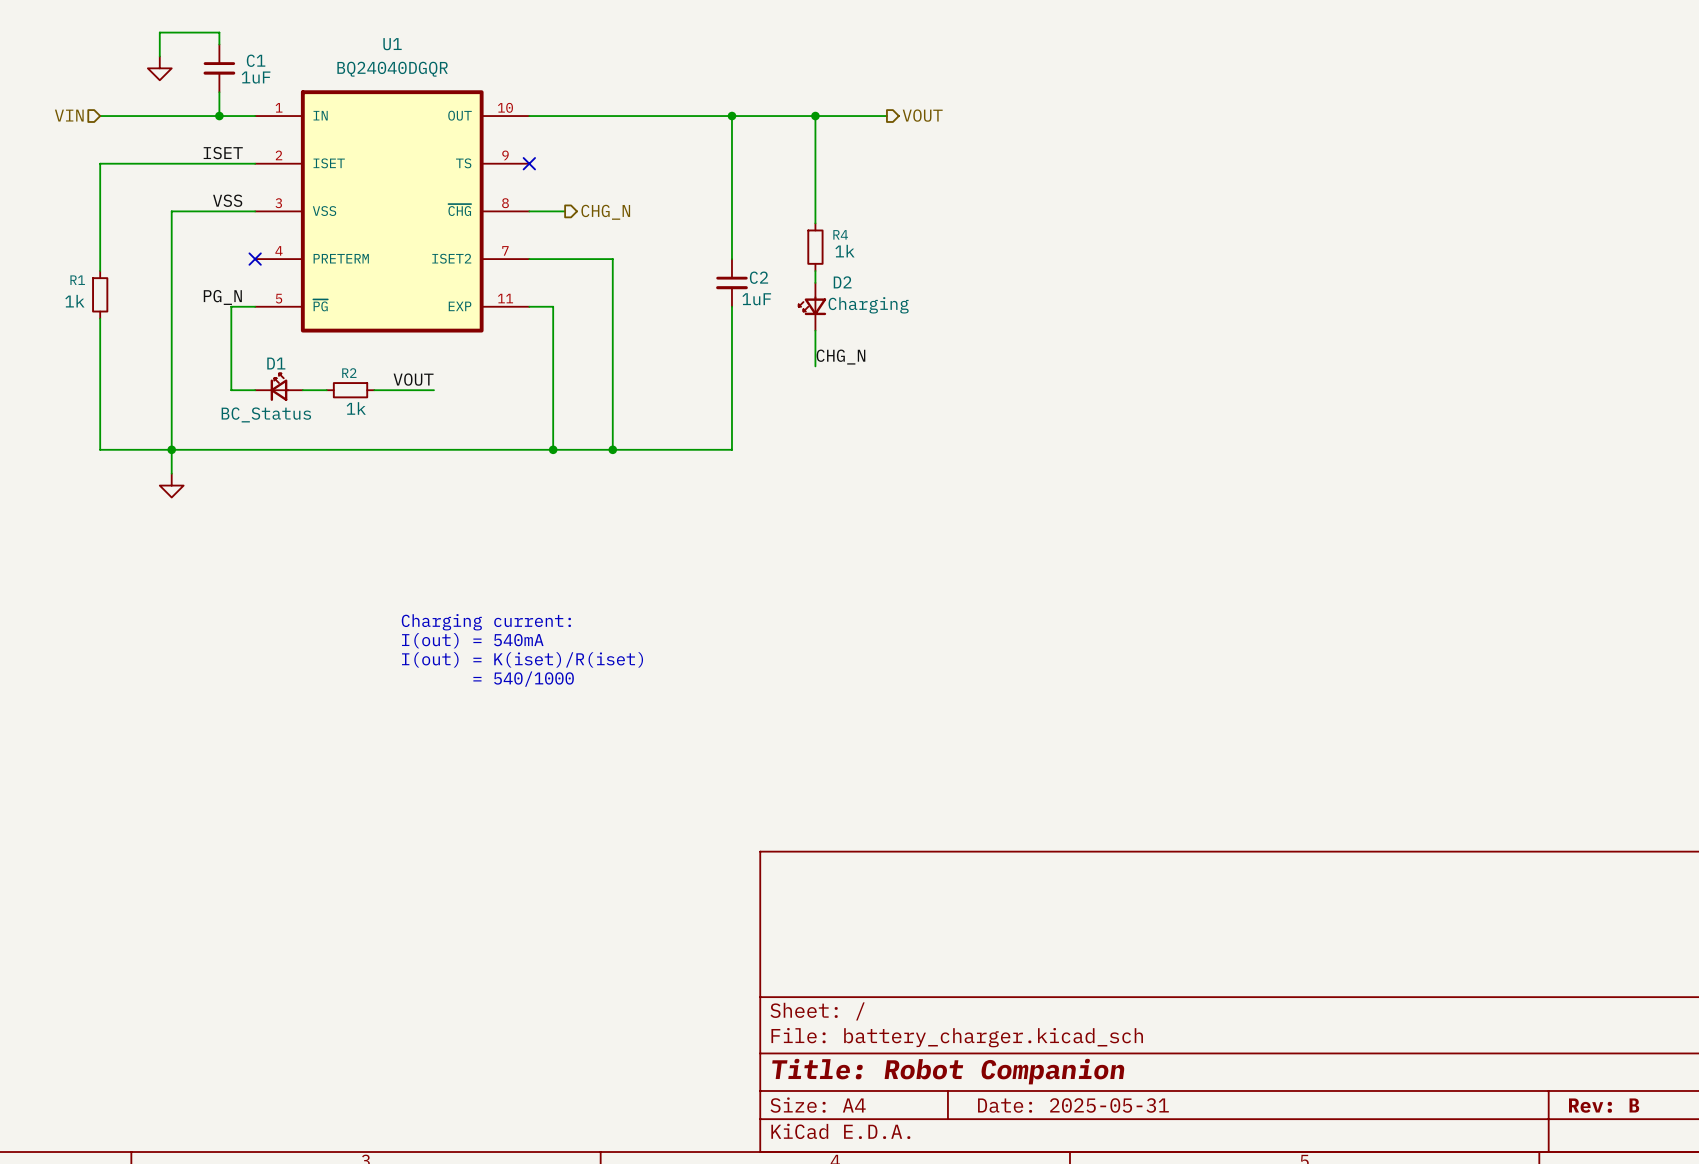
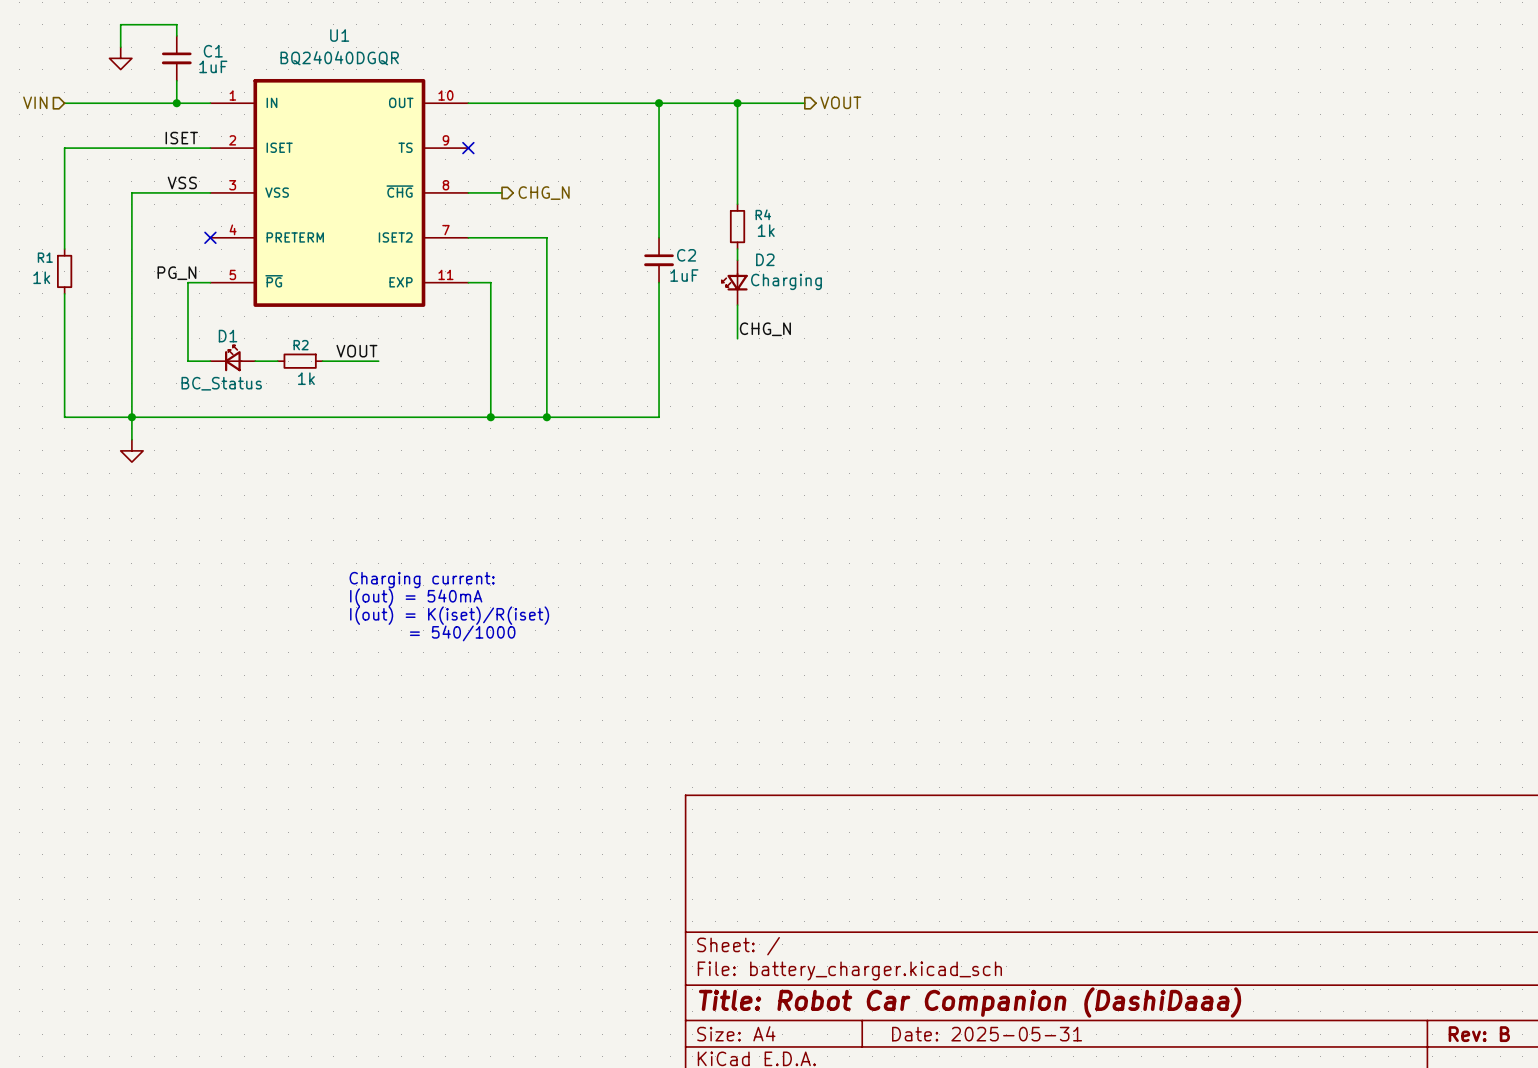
title block: Title: Robot Companion (948, 1071) -> Title: Robot Car Companion (DashiDaaa) (970, 1002)

